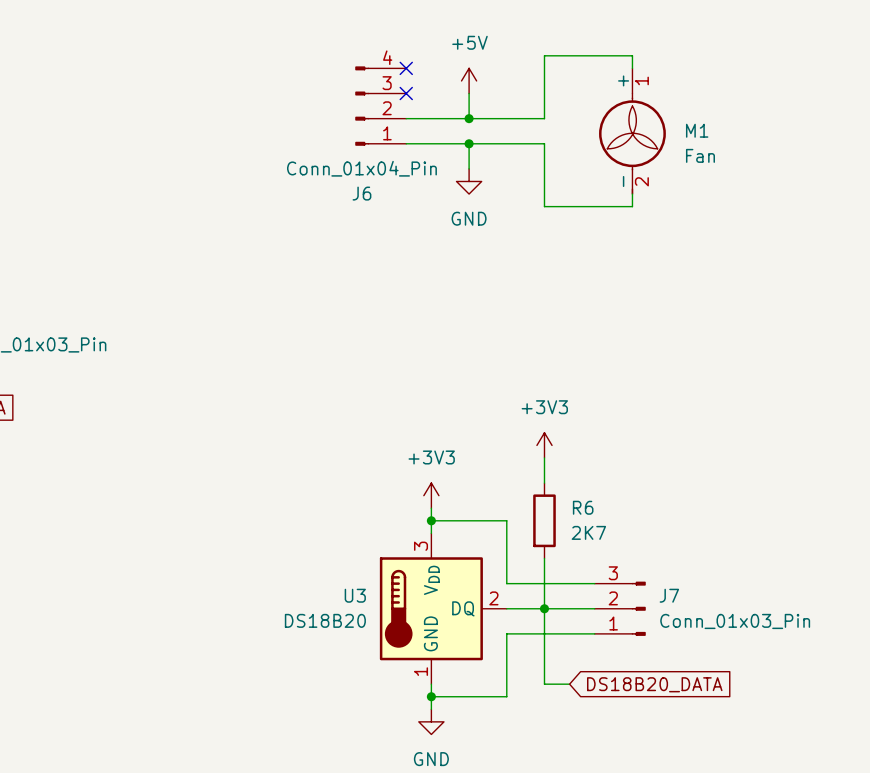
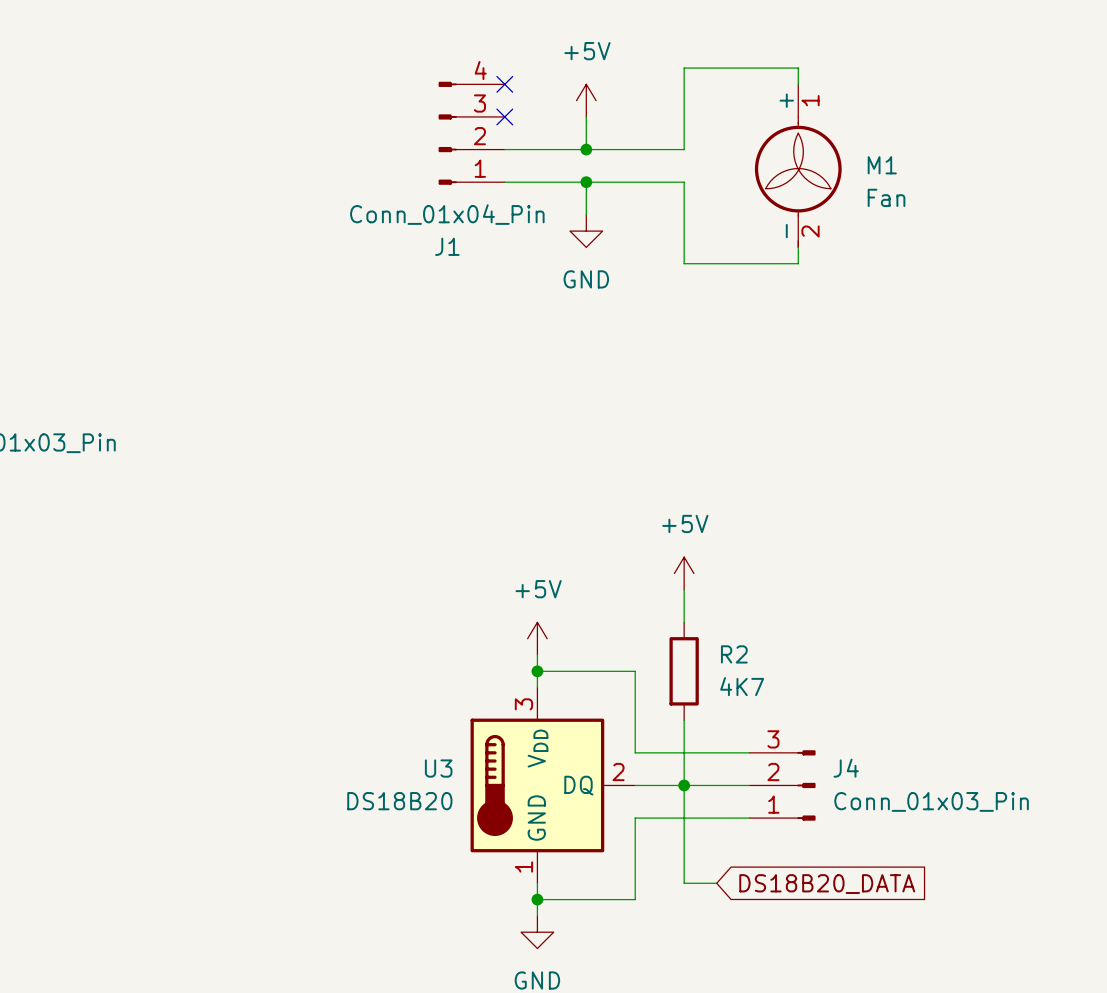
J6 name: J6 (361, 193) -> J1 (447, 246)
power symbol: +3V3 (544, 445) -> +5V (684, 573)
power symbol: +3V3 (431, 495) -> +5V (537, 638)
R6 name: R6 (583, 507) -> R2 (734, 654)
R6 value: 2K7 (588, 532) -> 4K7 (742, 686)
J7 name: J7 (669, 595) -> J4 (846, 768)

